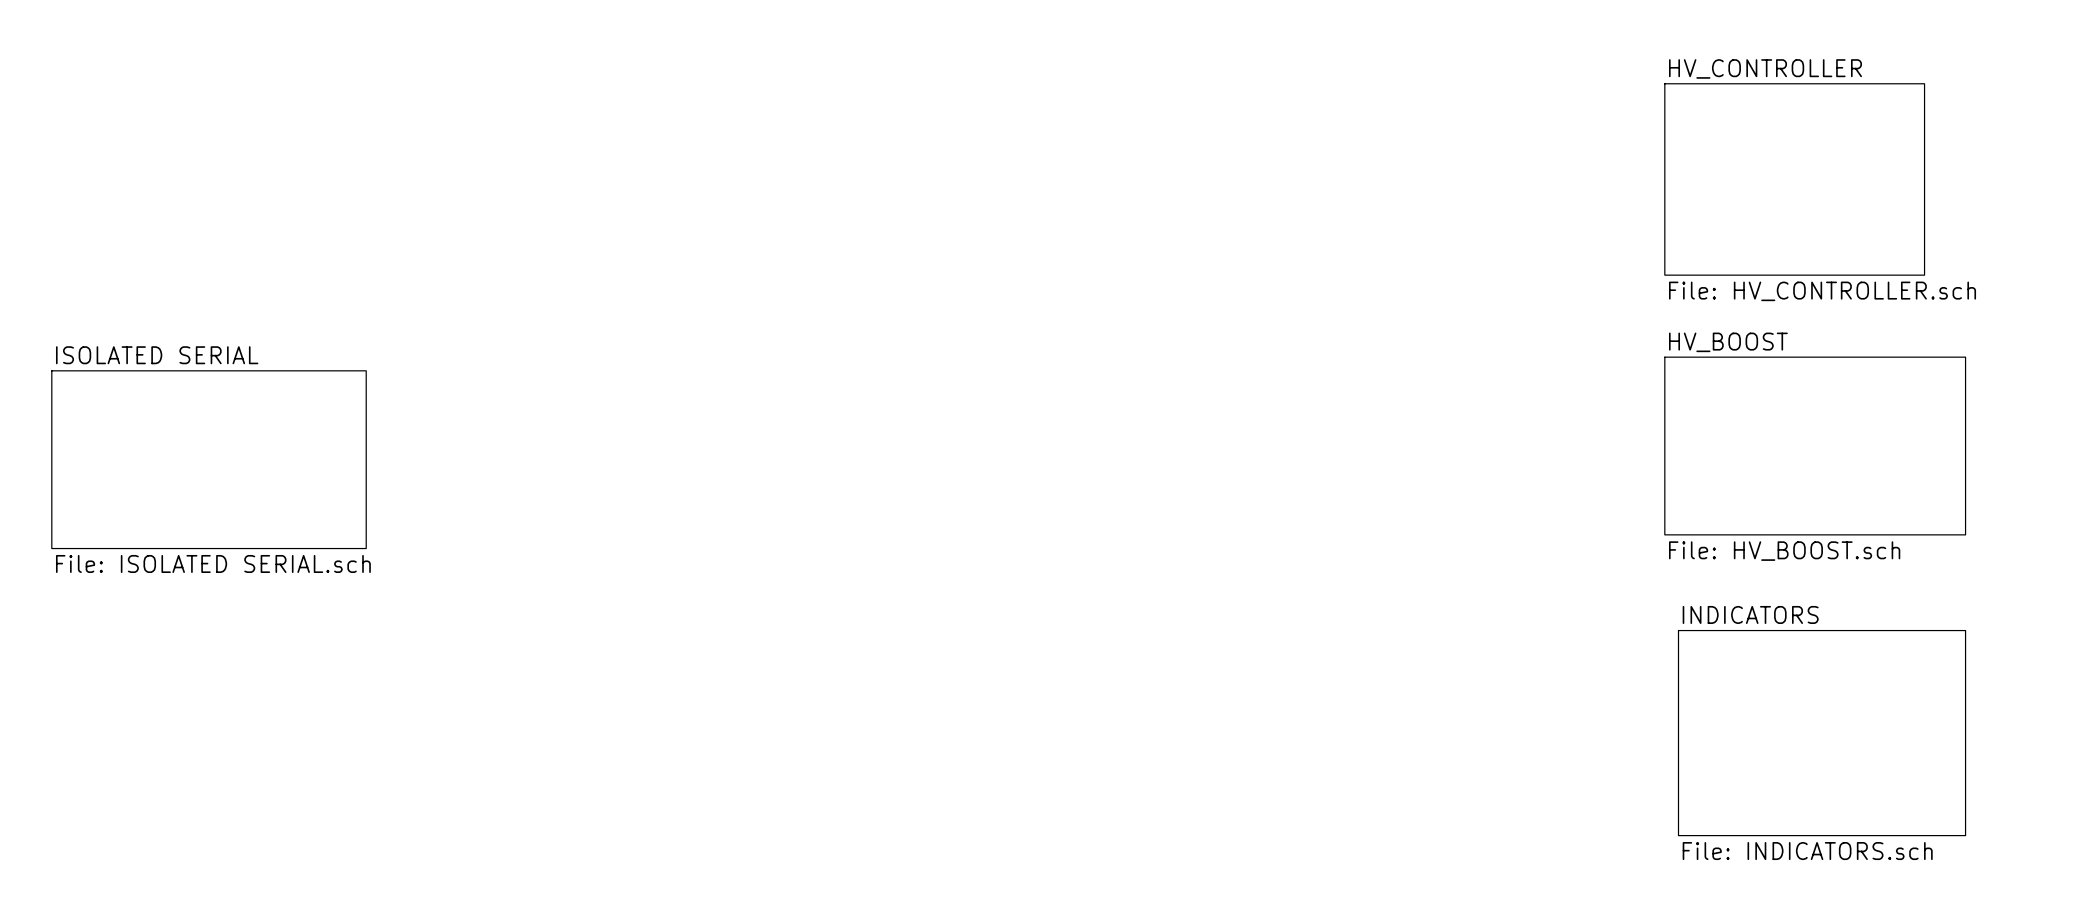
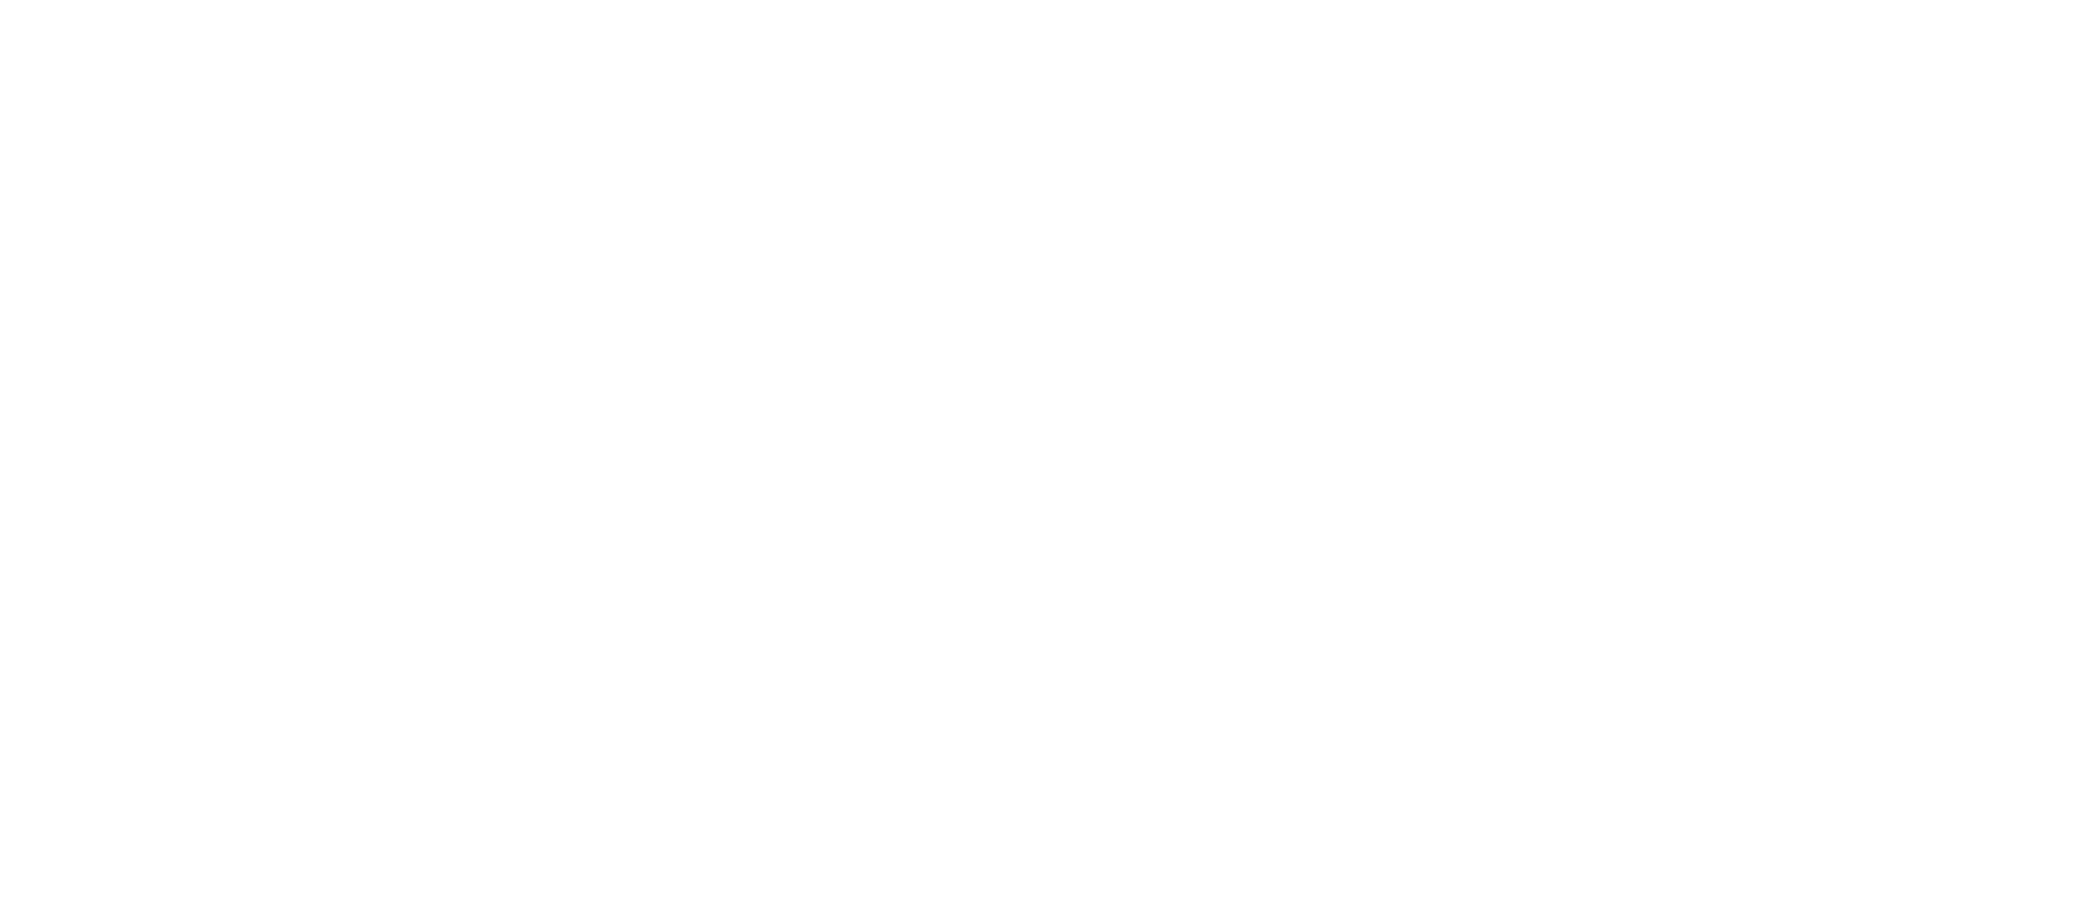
sheet HV_CONTROLLER: File: HV_CONTROLLER.sch (1794, 179) -> none
sheet HV_BOOST: File: HV_BOOST.sch (1815, 446) -> none
sheet ISOLATED SERIAL: File: ISOLATED SERIAL.sch (209, 459) -> none
sheet INDICATORS: File: INDICATORS.sch (1822, 733) -> none

